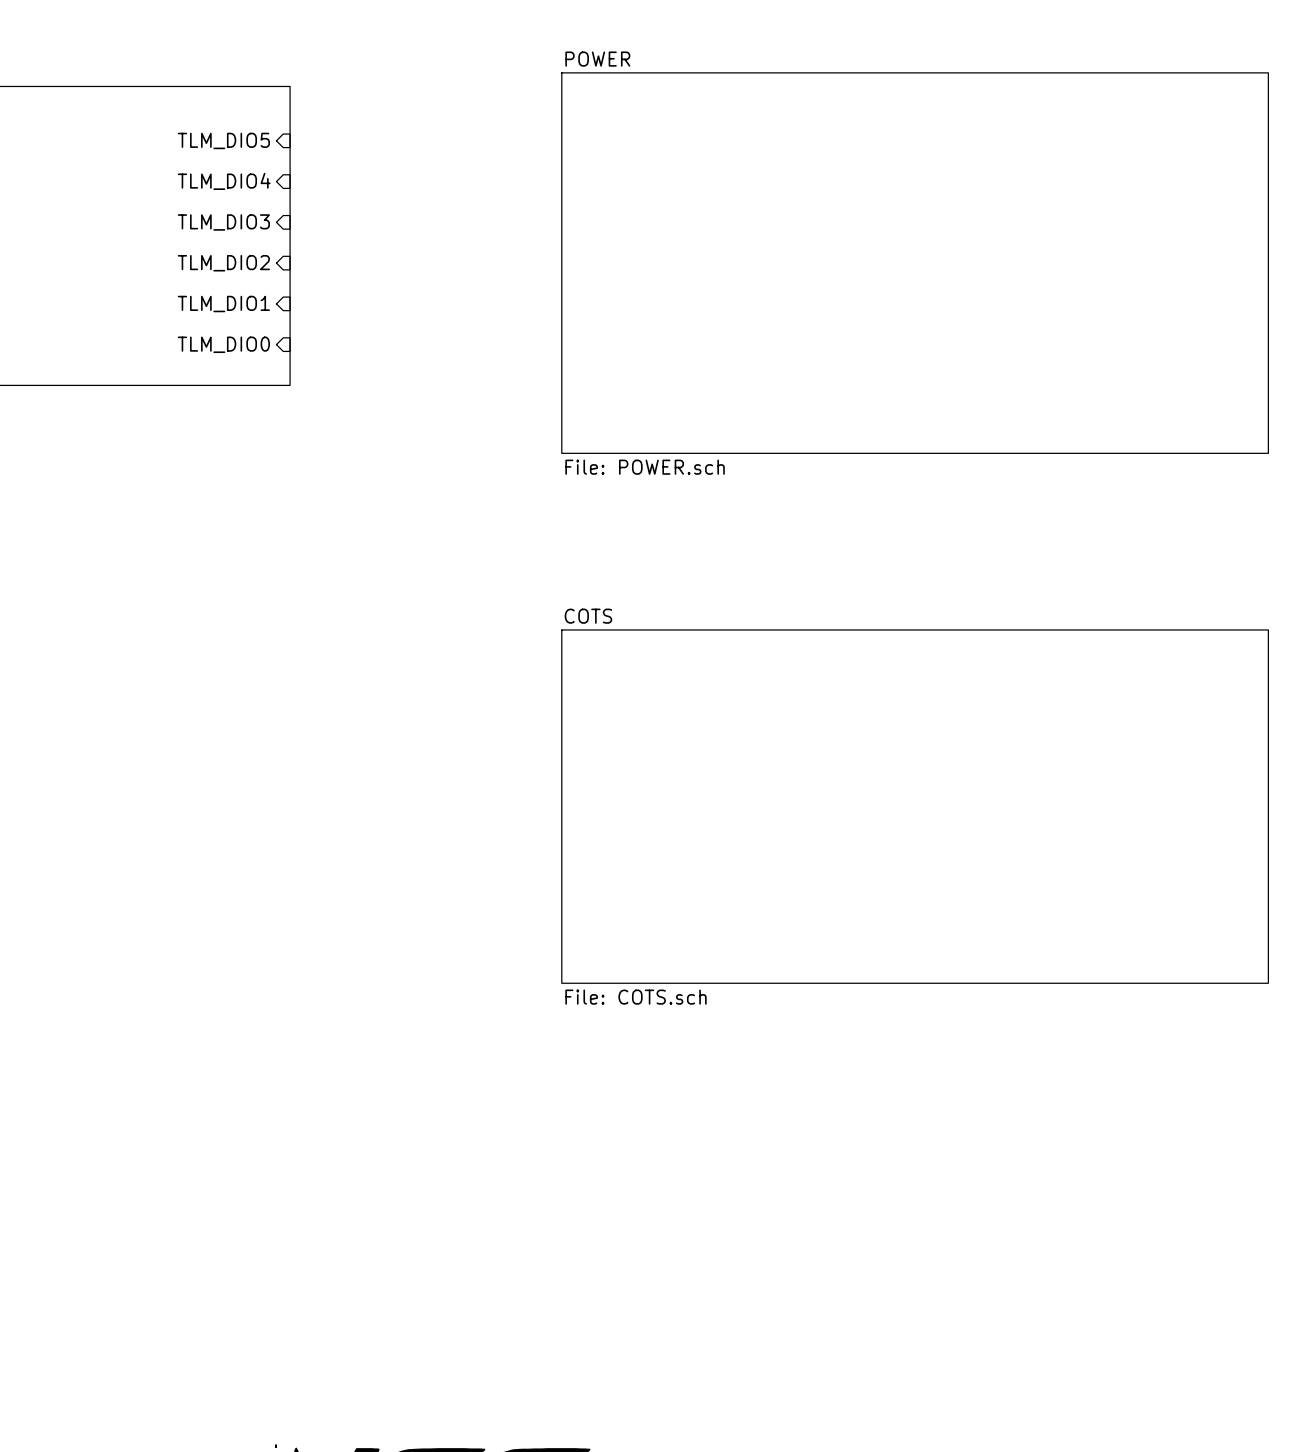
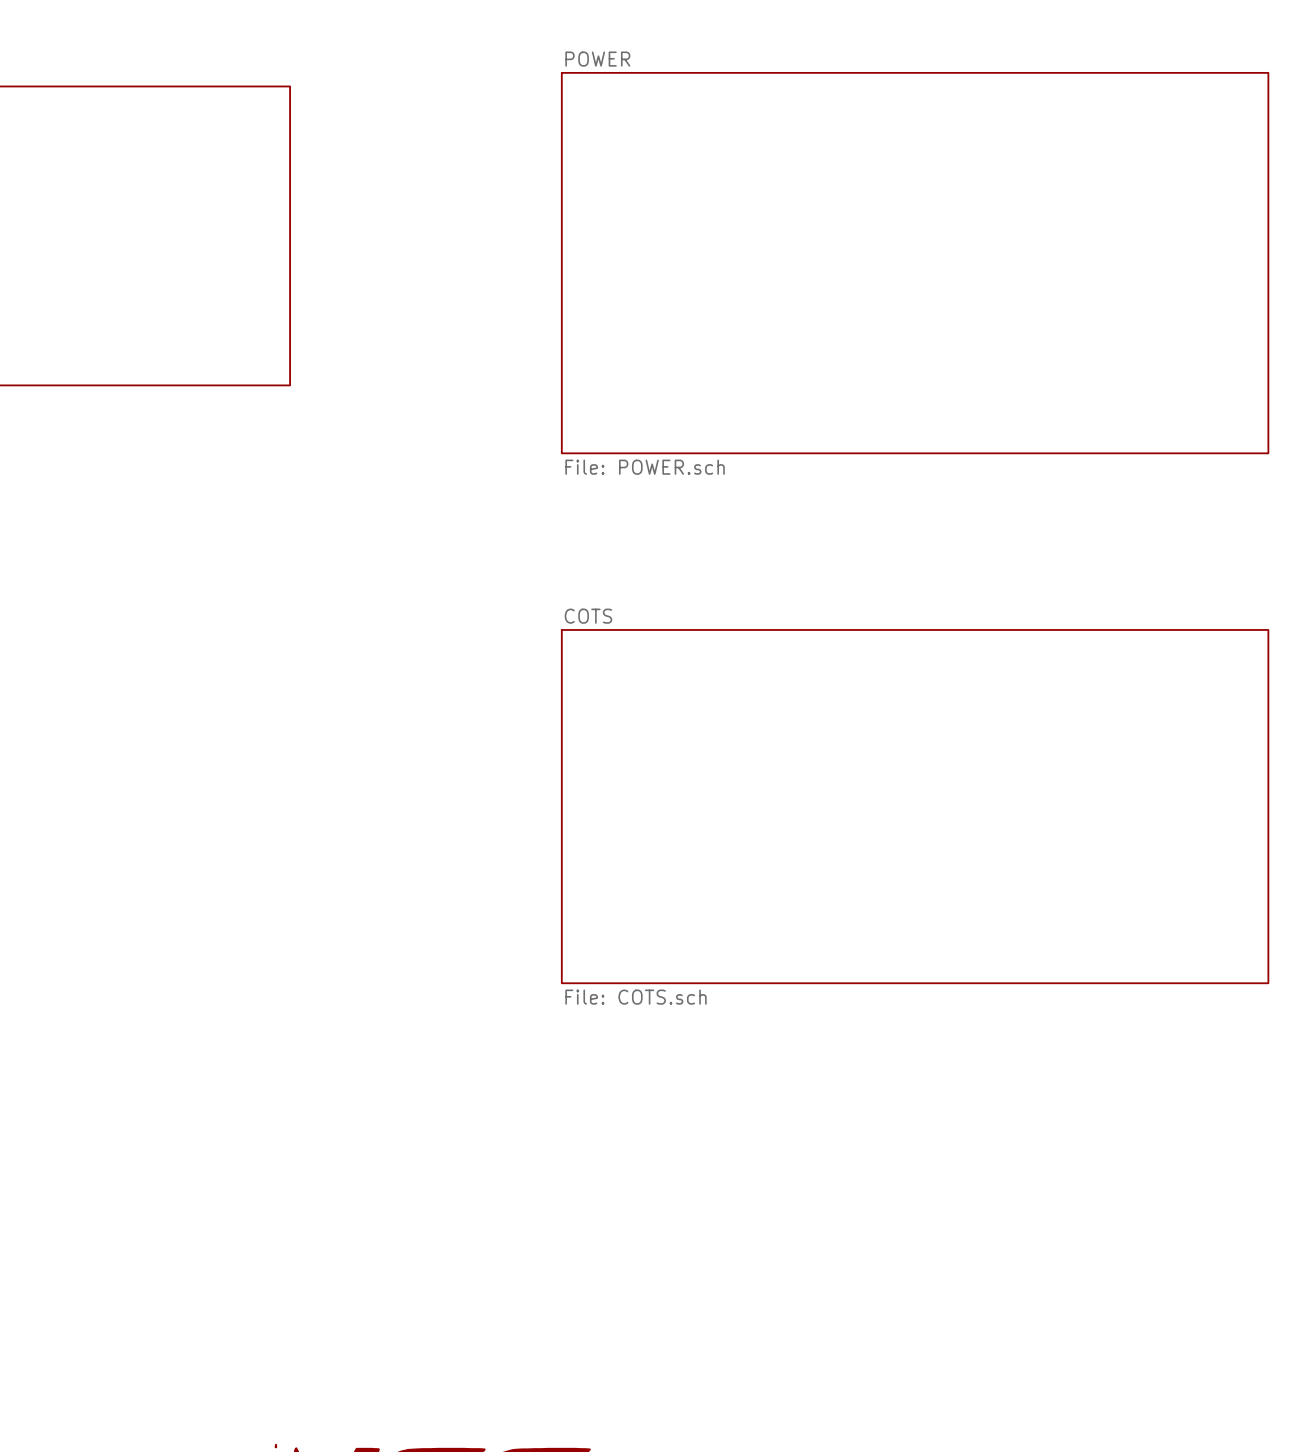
sheet pin: TLM_DIO5 (223, 140) -> none
sheet pin: TLM_DIO4 (224, 181) -> none
sheet pin: TLM_DIO3 (223, 222) -> none
sheet pin: TLM_DIO2 (223, 263) -> none
sheet pin: TLM_DIO1 (223, 304) -> none
sheet pin: TLM_DIO0 (223, 344) -> none

